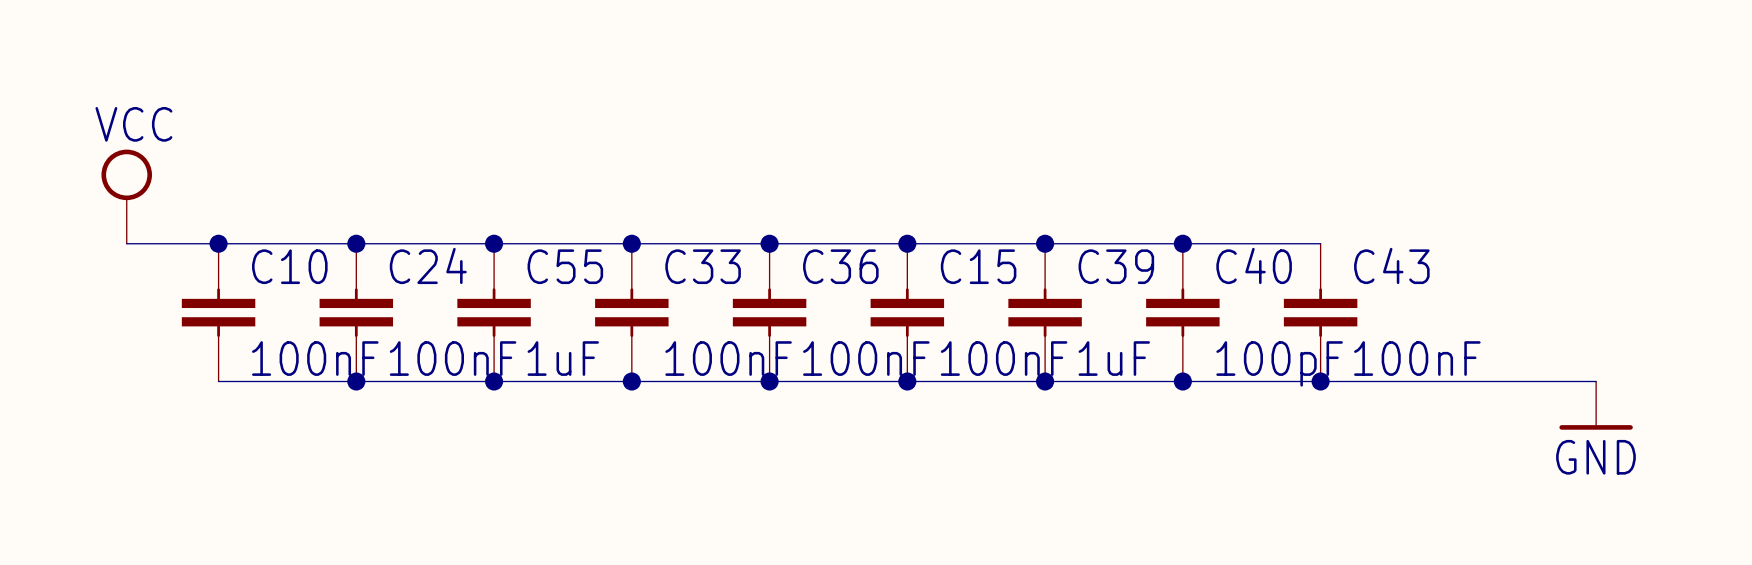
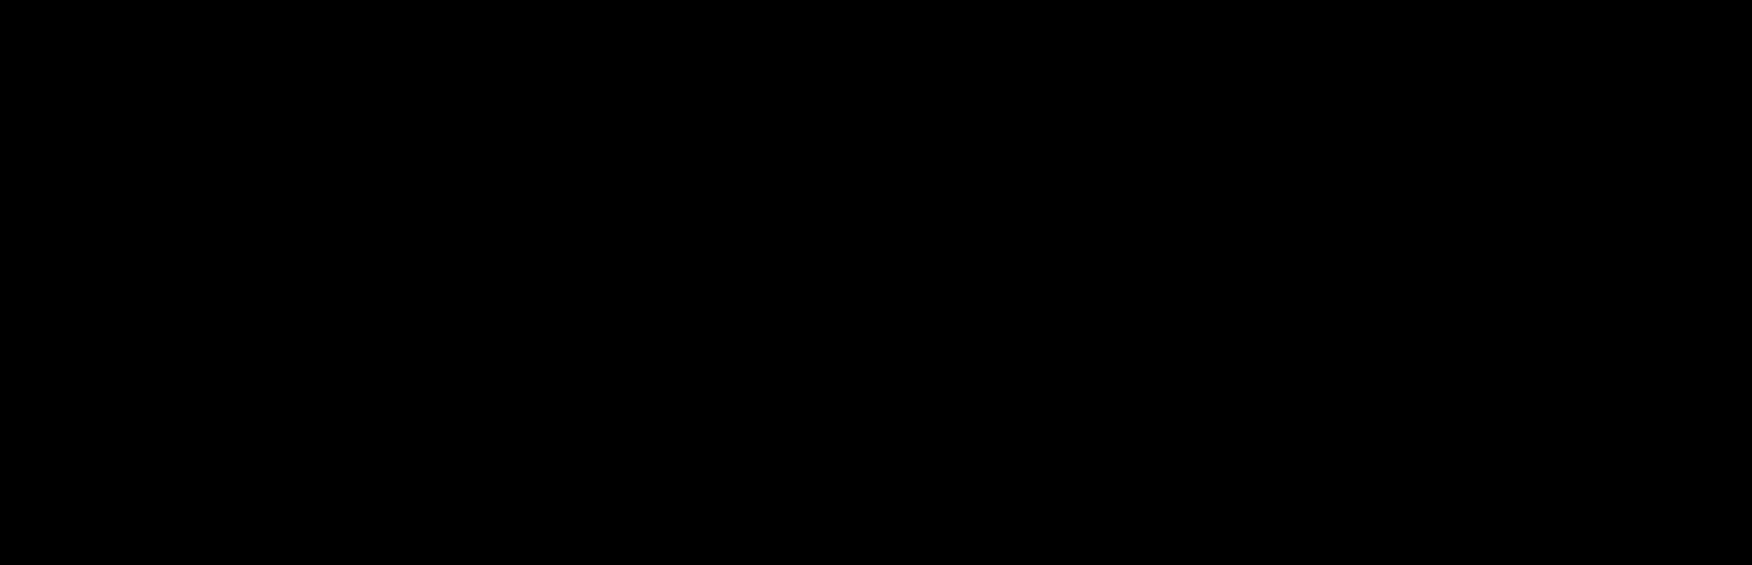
power symbol: VCC (126, 196) -> none
wire: (126, 243) (1320, 243) -> none
junction: (218, 243) -> none
junction: (356, 243) -> none
junction: (494, 243) -> none
junction: (631, 243) -> none
junction: (769, 243) -> none
junction: (907, 243) -> none
junction: (1045, 243) -> none
junction: (1182, 243) -> none
C10: 100nF (218, 312) -> none
C24: 100nF (356, 312) -> none
C55: 1uF (494, 312) -> none
C33: 100nF (631, 312) -> none
C36: 100nF (769, 312) -> none
C15: 100nF (907, 312) -> none
C39: 1uF (1045, 312) -> none
C40: 100pF (1182, 312) -> none
C43: 100nF (1320, 312) -> none
wire: (218, 381) (1596, 381) -> none
junction: (356, 381) -> none
junction: (494, 381) -> none
junction: (631, 381) -> none
junction: (769, 381) -> none
junction: (907, 381) -> none
junction: (1045, 381) -> none
junction: (1182, 381) -> none
junction: (1320, 381) -> none
power symbol: GND (1596, 405) -> none

